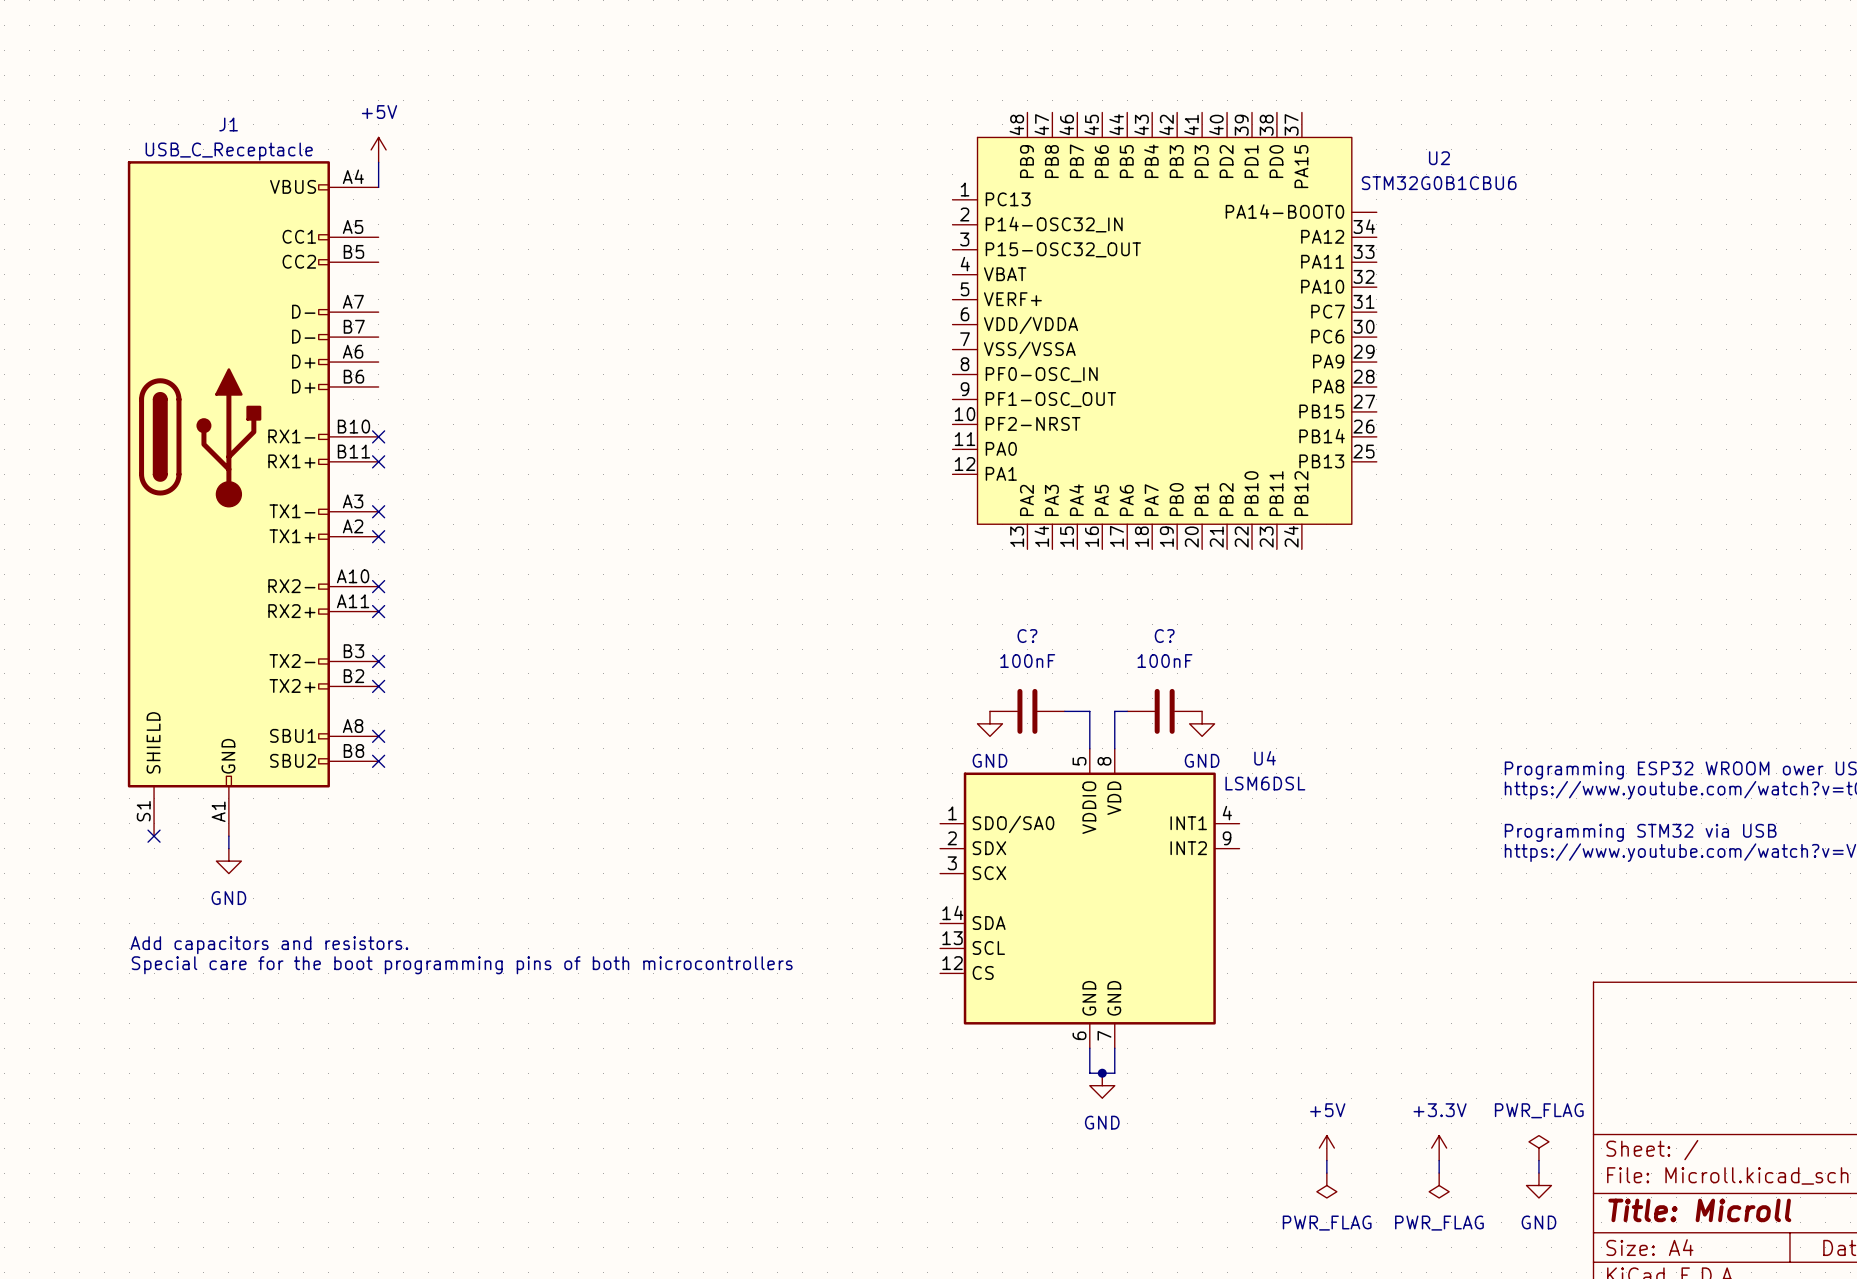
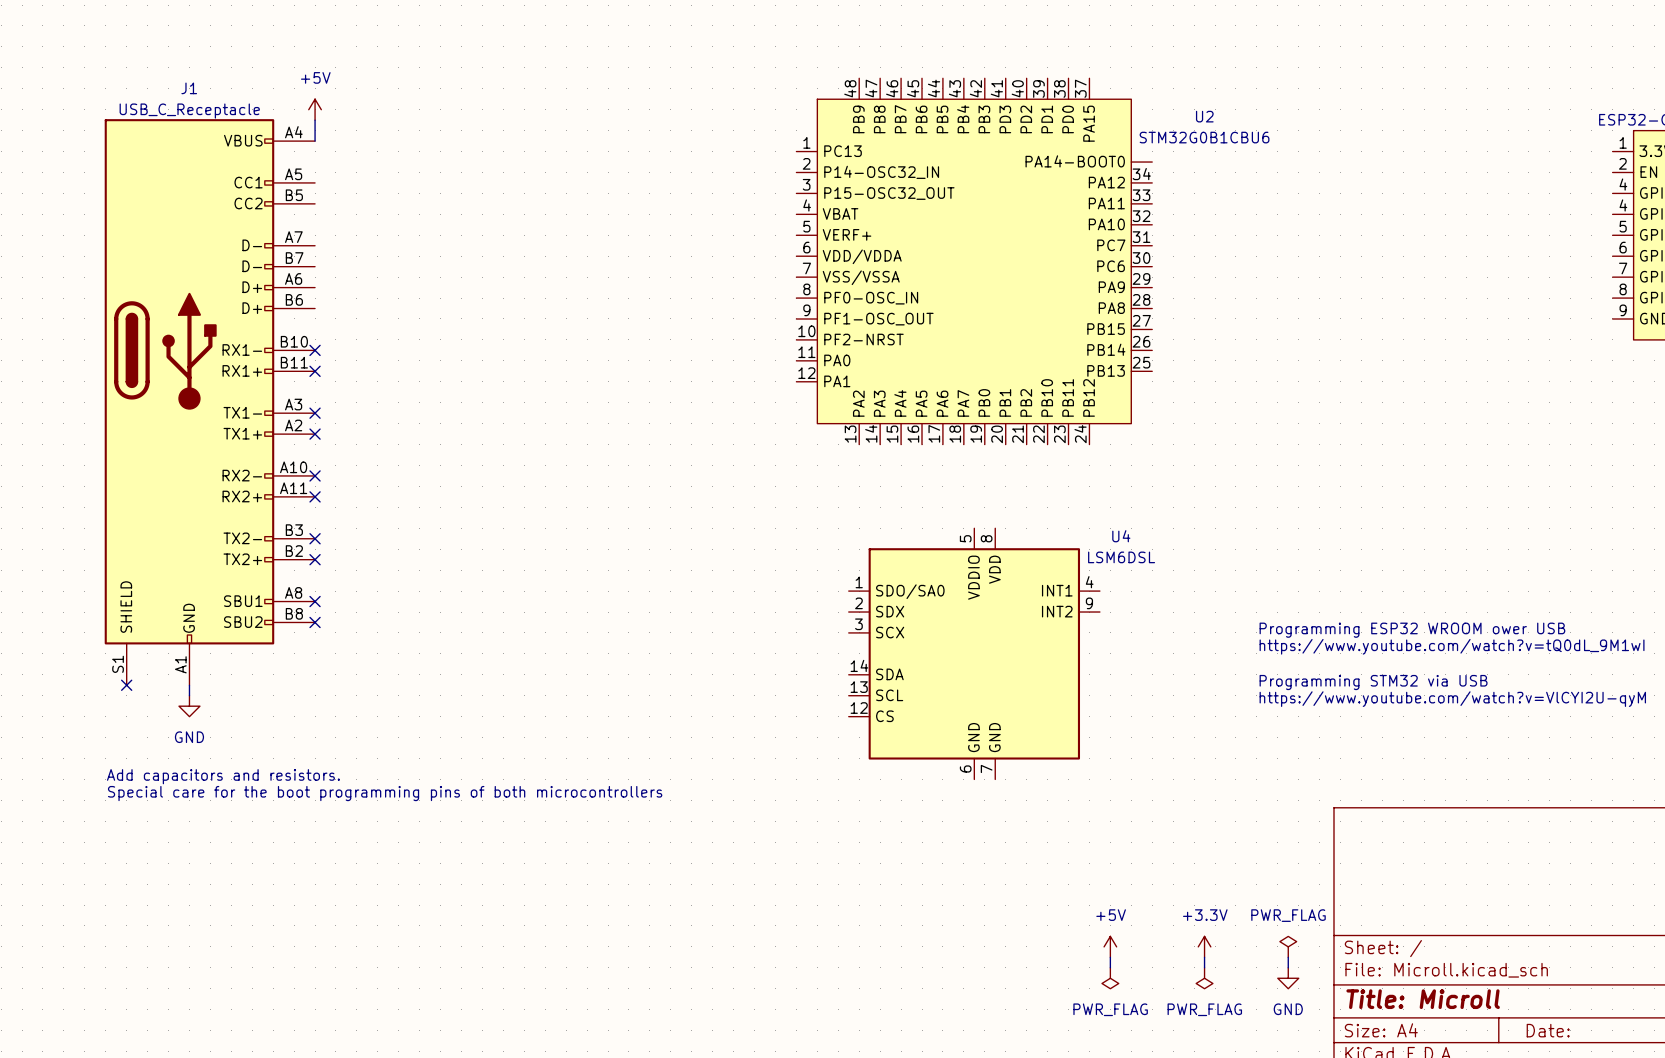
C?: 100nF (1027, 711) -> none
C?: 100nF (1164, 711) -> none
power symbol: GND (989, 723) -> none
power symbol: GND (1202, 723) -> none
U4 position: (1089, 898) -> (974, 653)
wire: (1089, 1048) (1089, 1073) (1114, 1073) (1114, 1048) -> none
junction: (1102, 1073) -> none
power symbol: GND (1102, 1085) -> none

